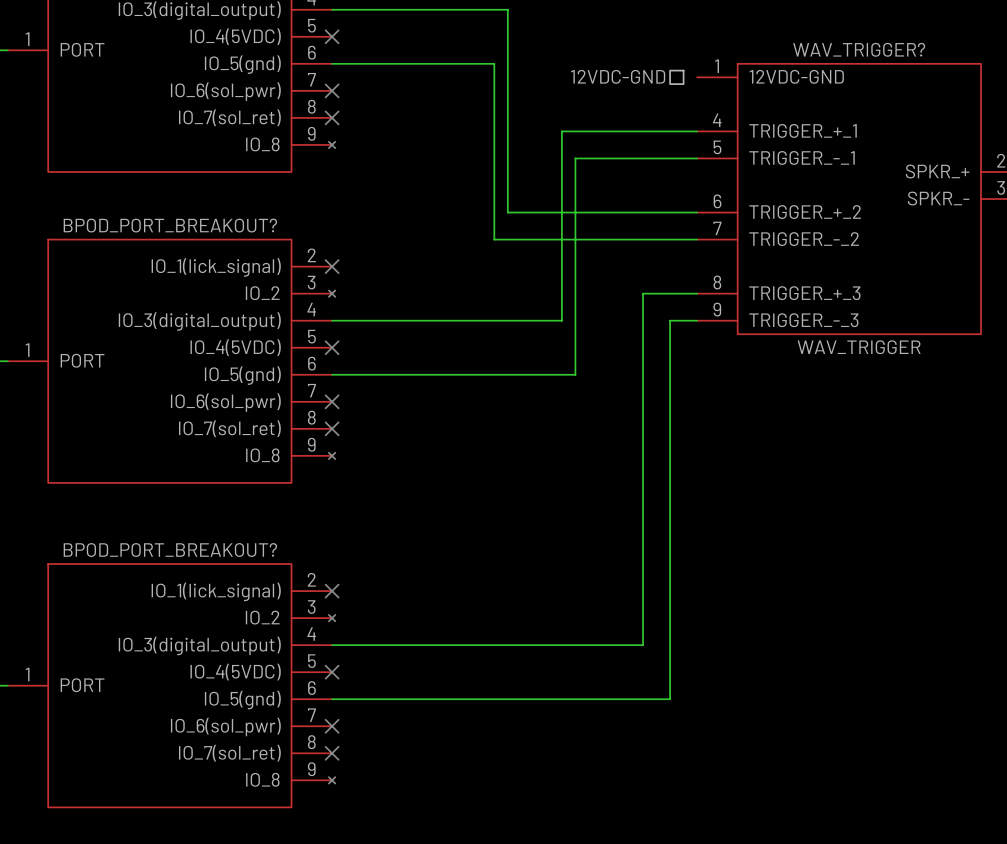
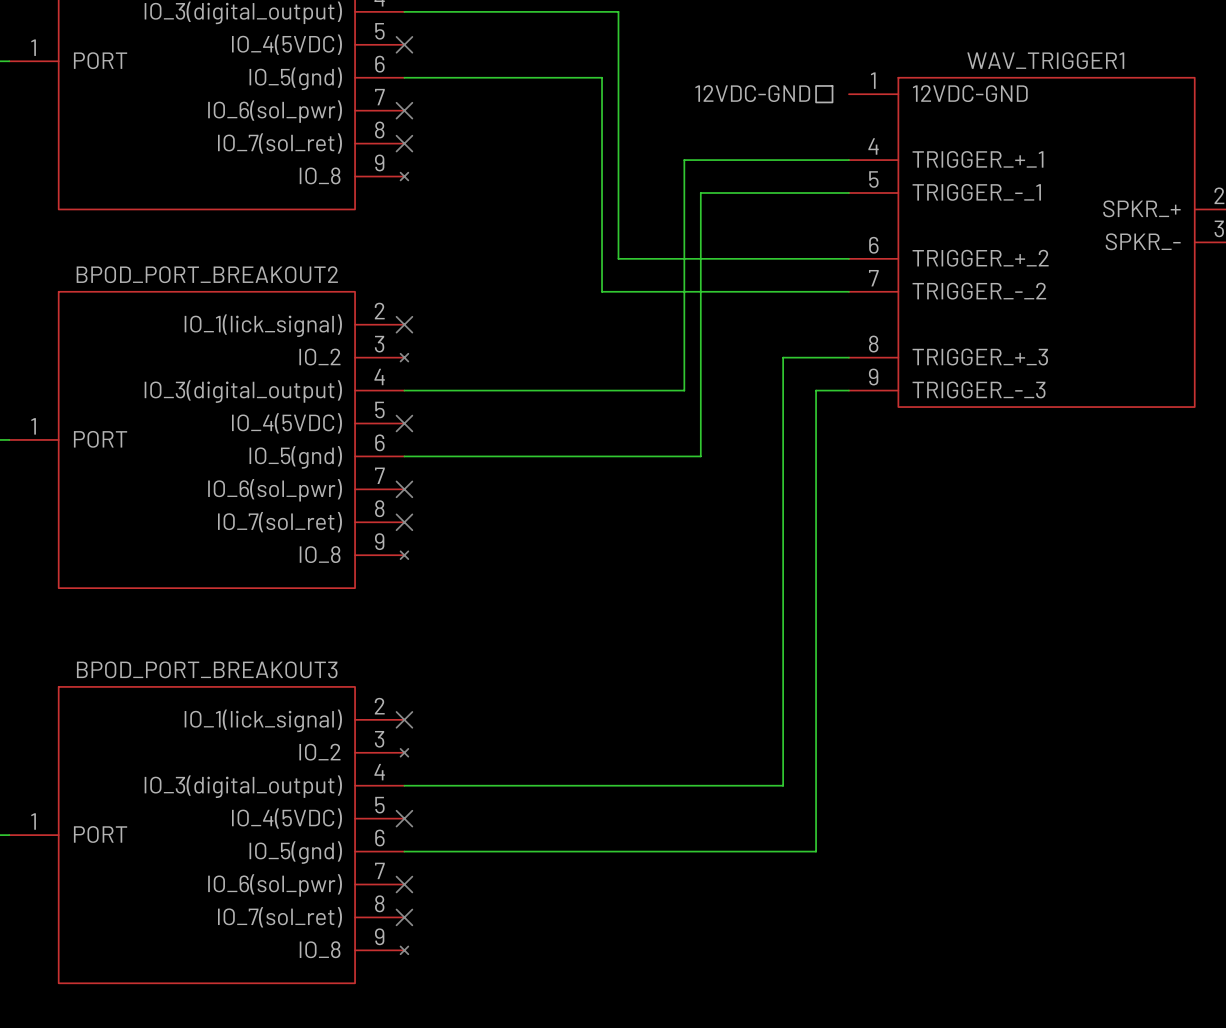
WAV_TRIGGER? name: WAV_TRIGGER? (859, 49) -> WAV_TRIGGER1 (1045, 60)
BPOD_PORT_BREAKOUT? name: BPOD_PORT_BREAKOUT? (170, 225) -> BPOD_PORT_BREAKOUT2 (207, 274)
WAV_TRIGGER? value: WAV_TRIGGER (859, 347) -> none
BPOD_PORT_BREAKOUT? name: BPOD_PORT_BREAKOUT? (170, 550) -> BPOD_PORT_BREAKOUT3 (207, 669)

